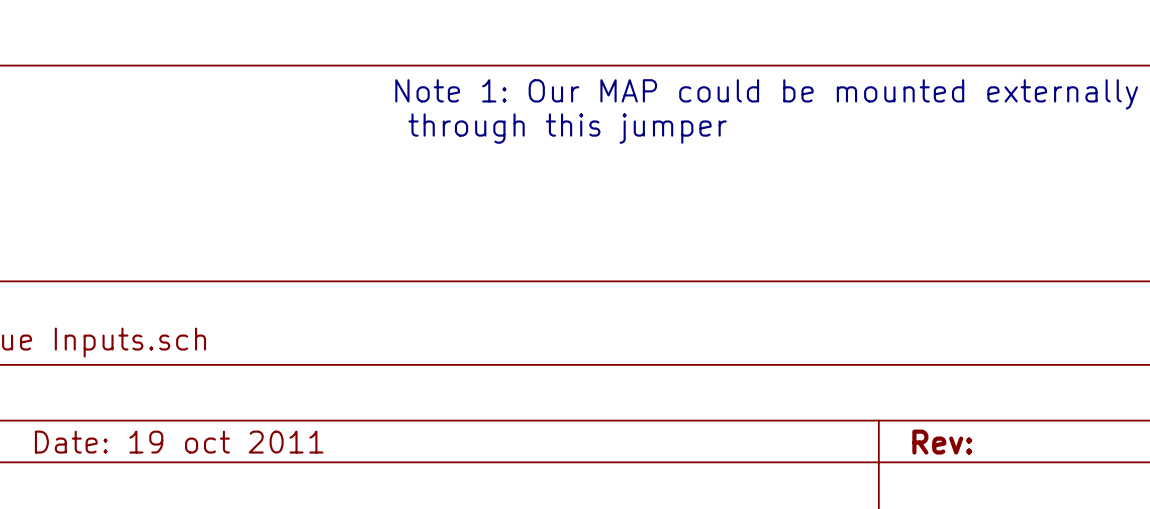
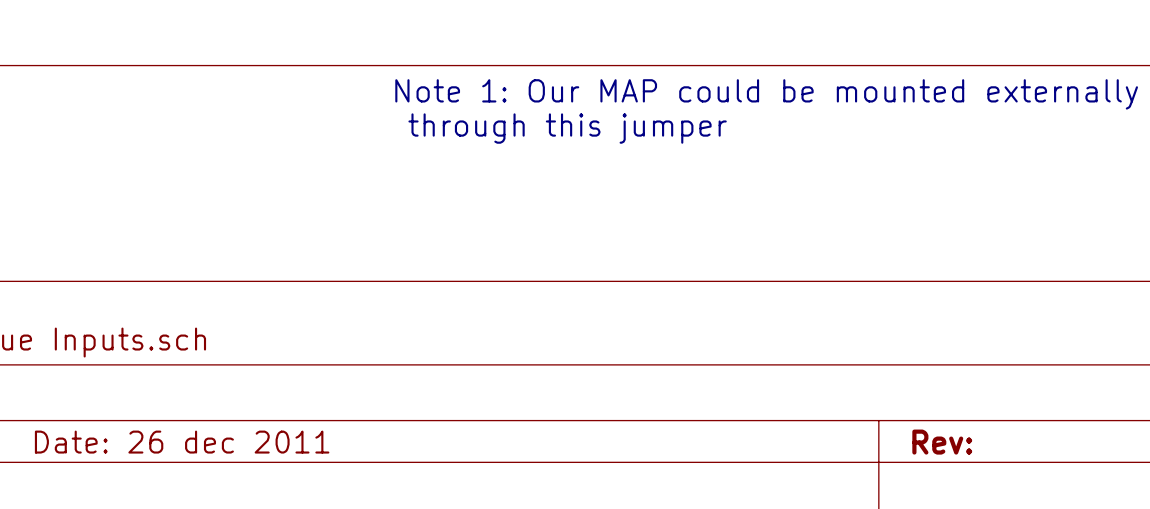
title block: Date: 19 oct 2011 (179, 442) -> Date: 26 dec 2011 (182, 442)

